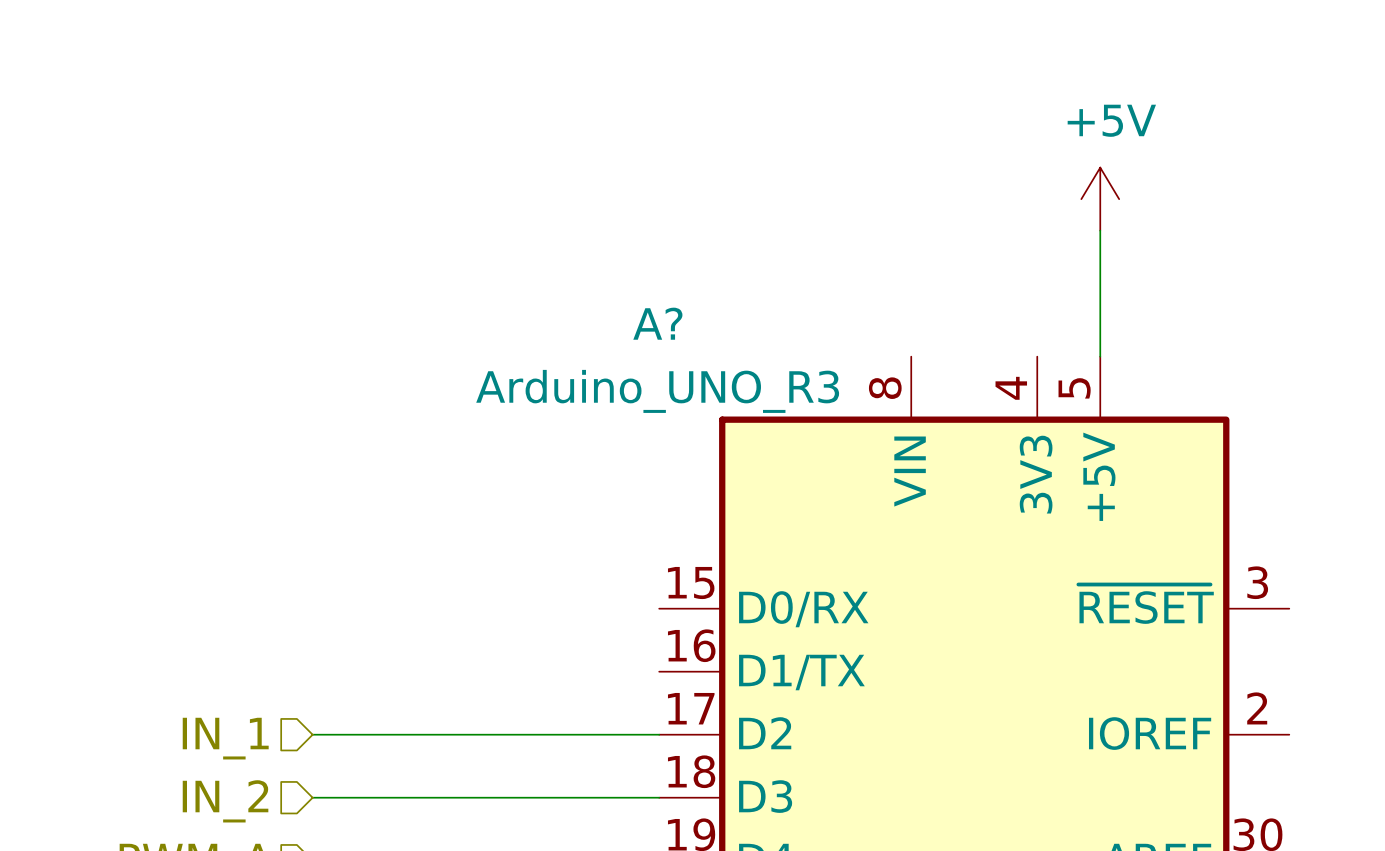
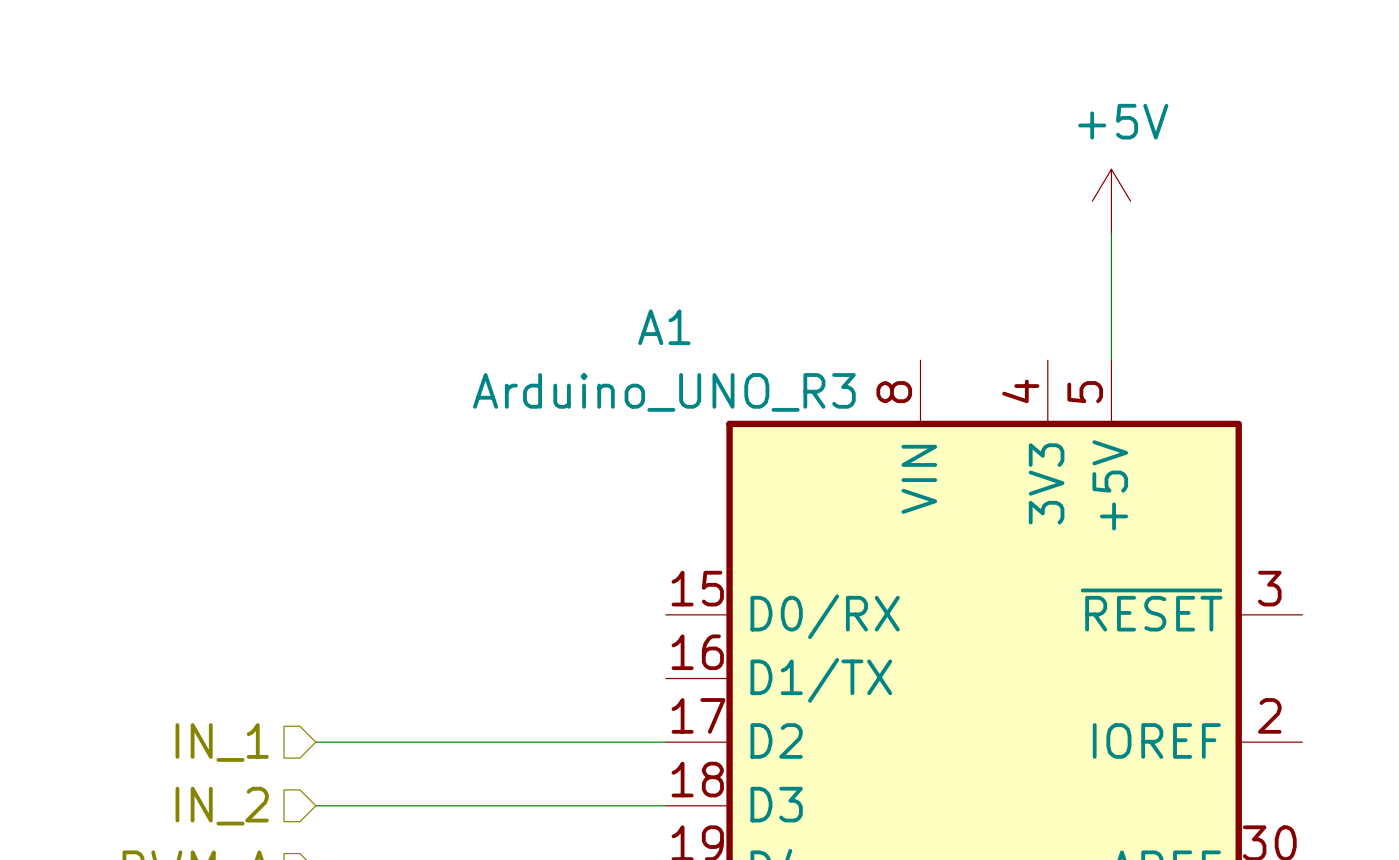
A? name: A? (657, 323) -> A1 (664, 327)

